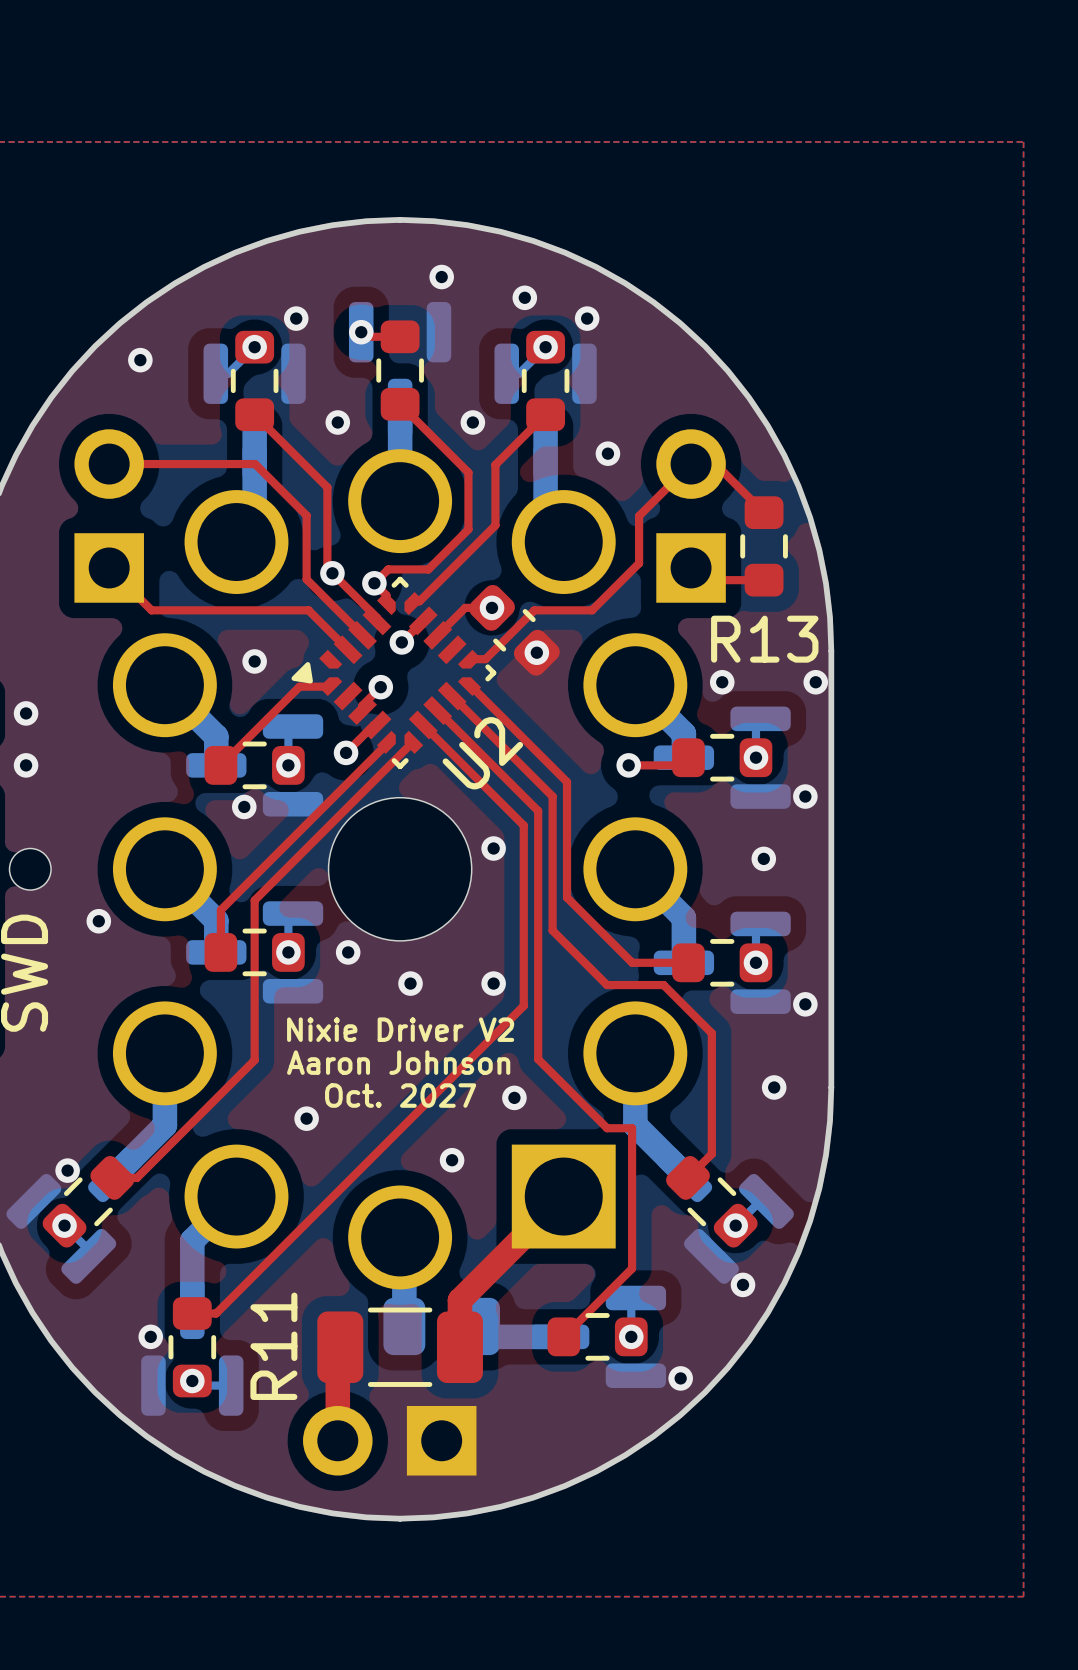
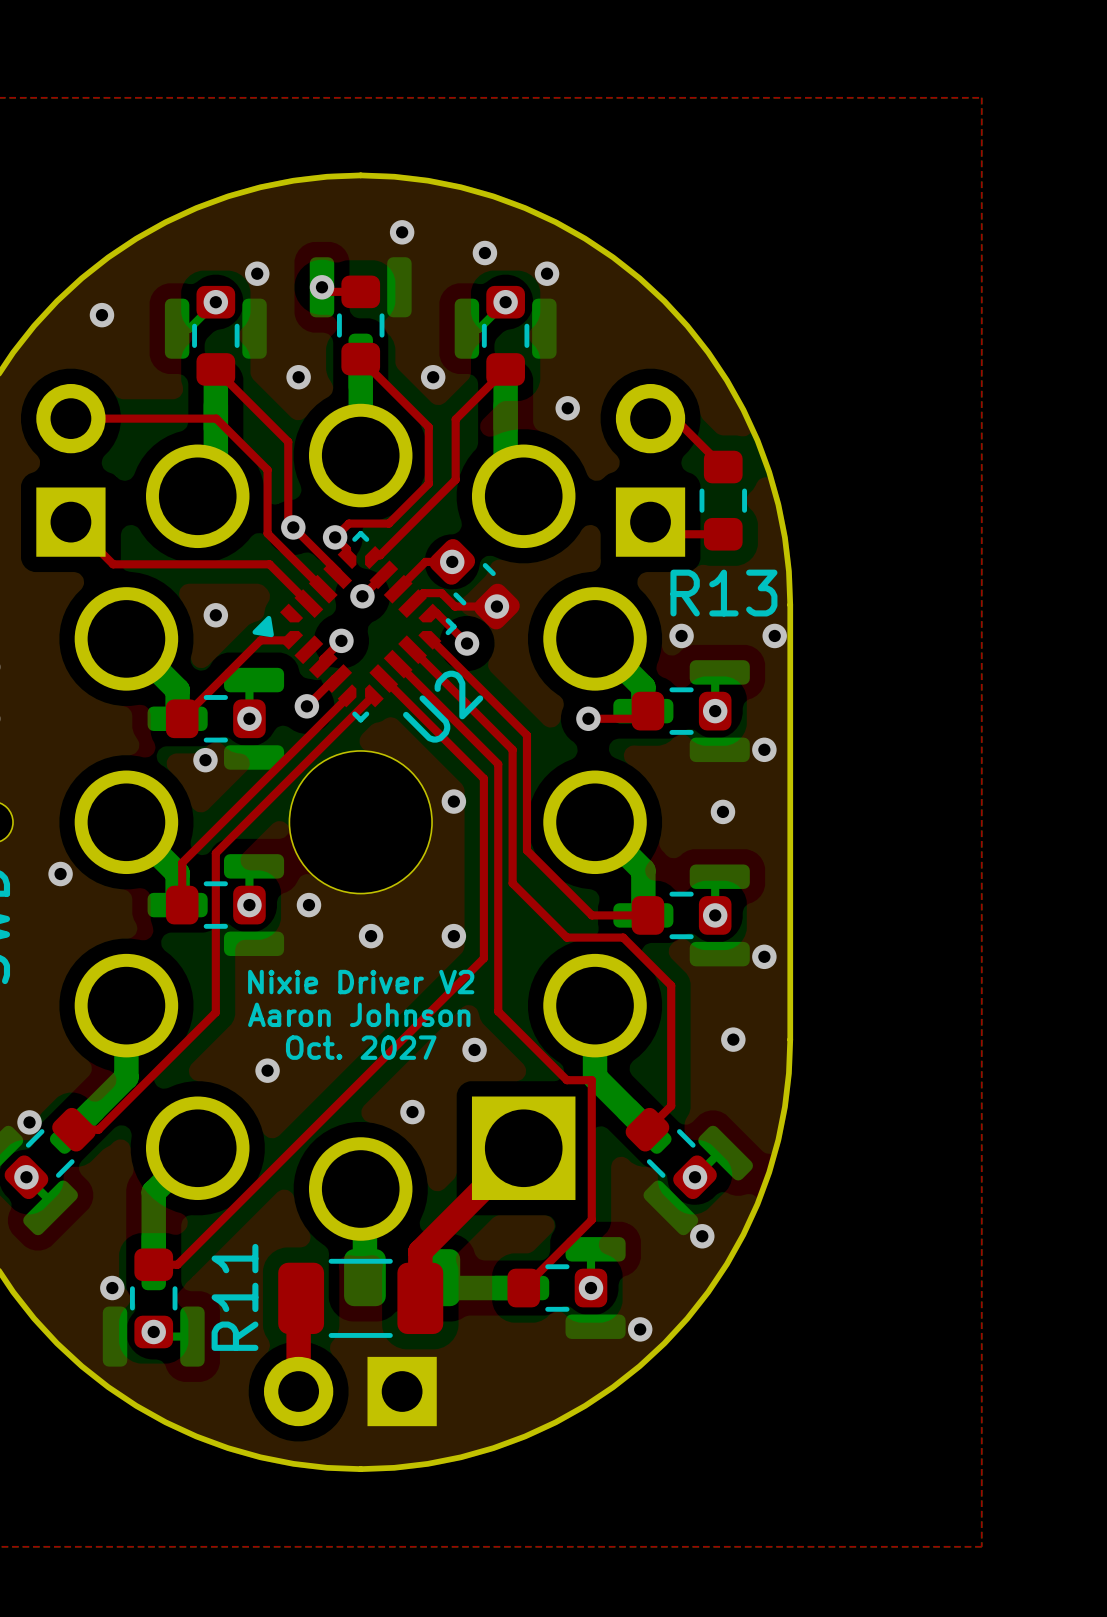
top track: (691, 464) (639, 516) (639, 563) (592, 610) (534, 610) (485, 659) (476, 659) -> (467, 643) (436, 612)
top track: none -> (412, 603) (423, 593) (441, 593) (454, 606) (496, 606)
via: none -> (467, 643)

